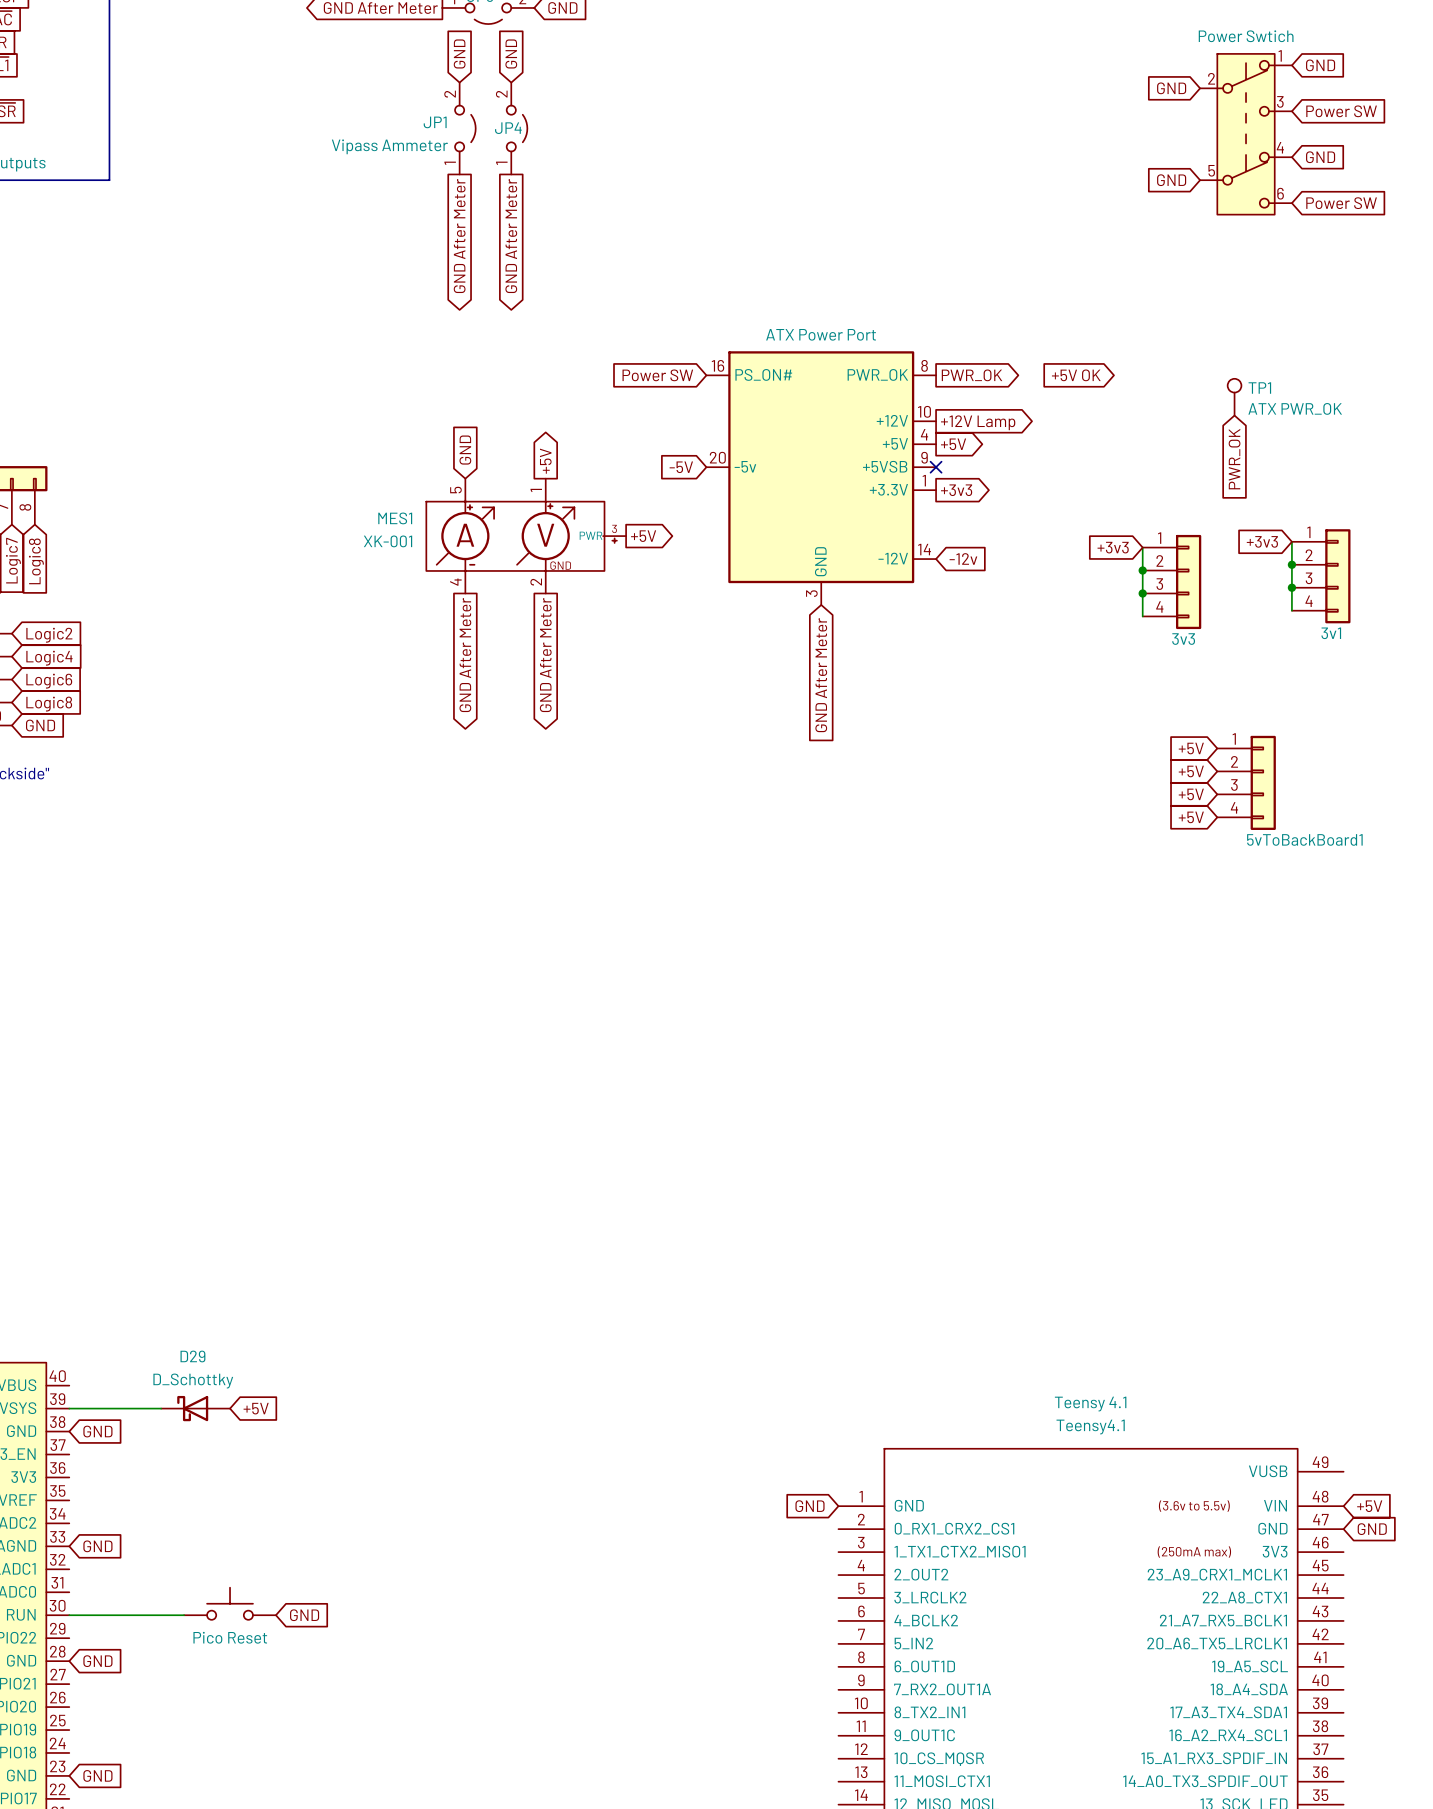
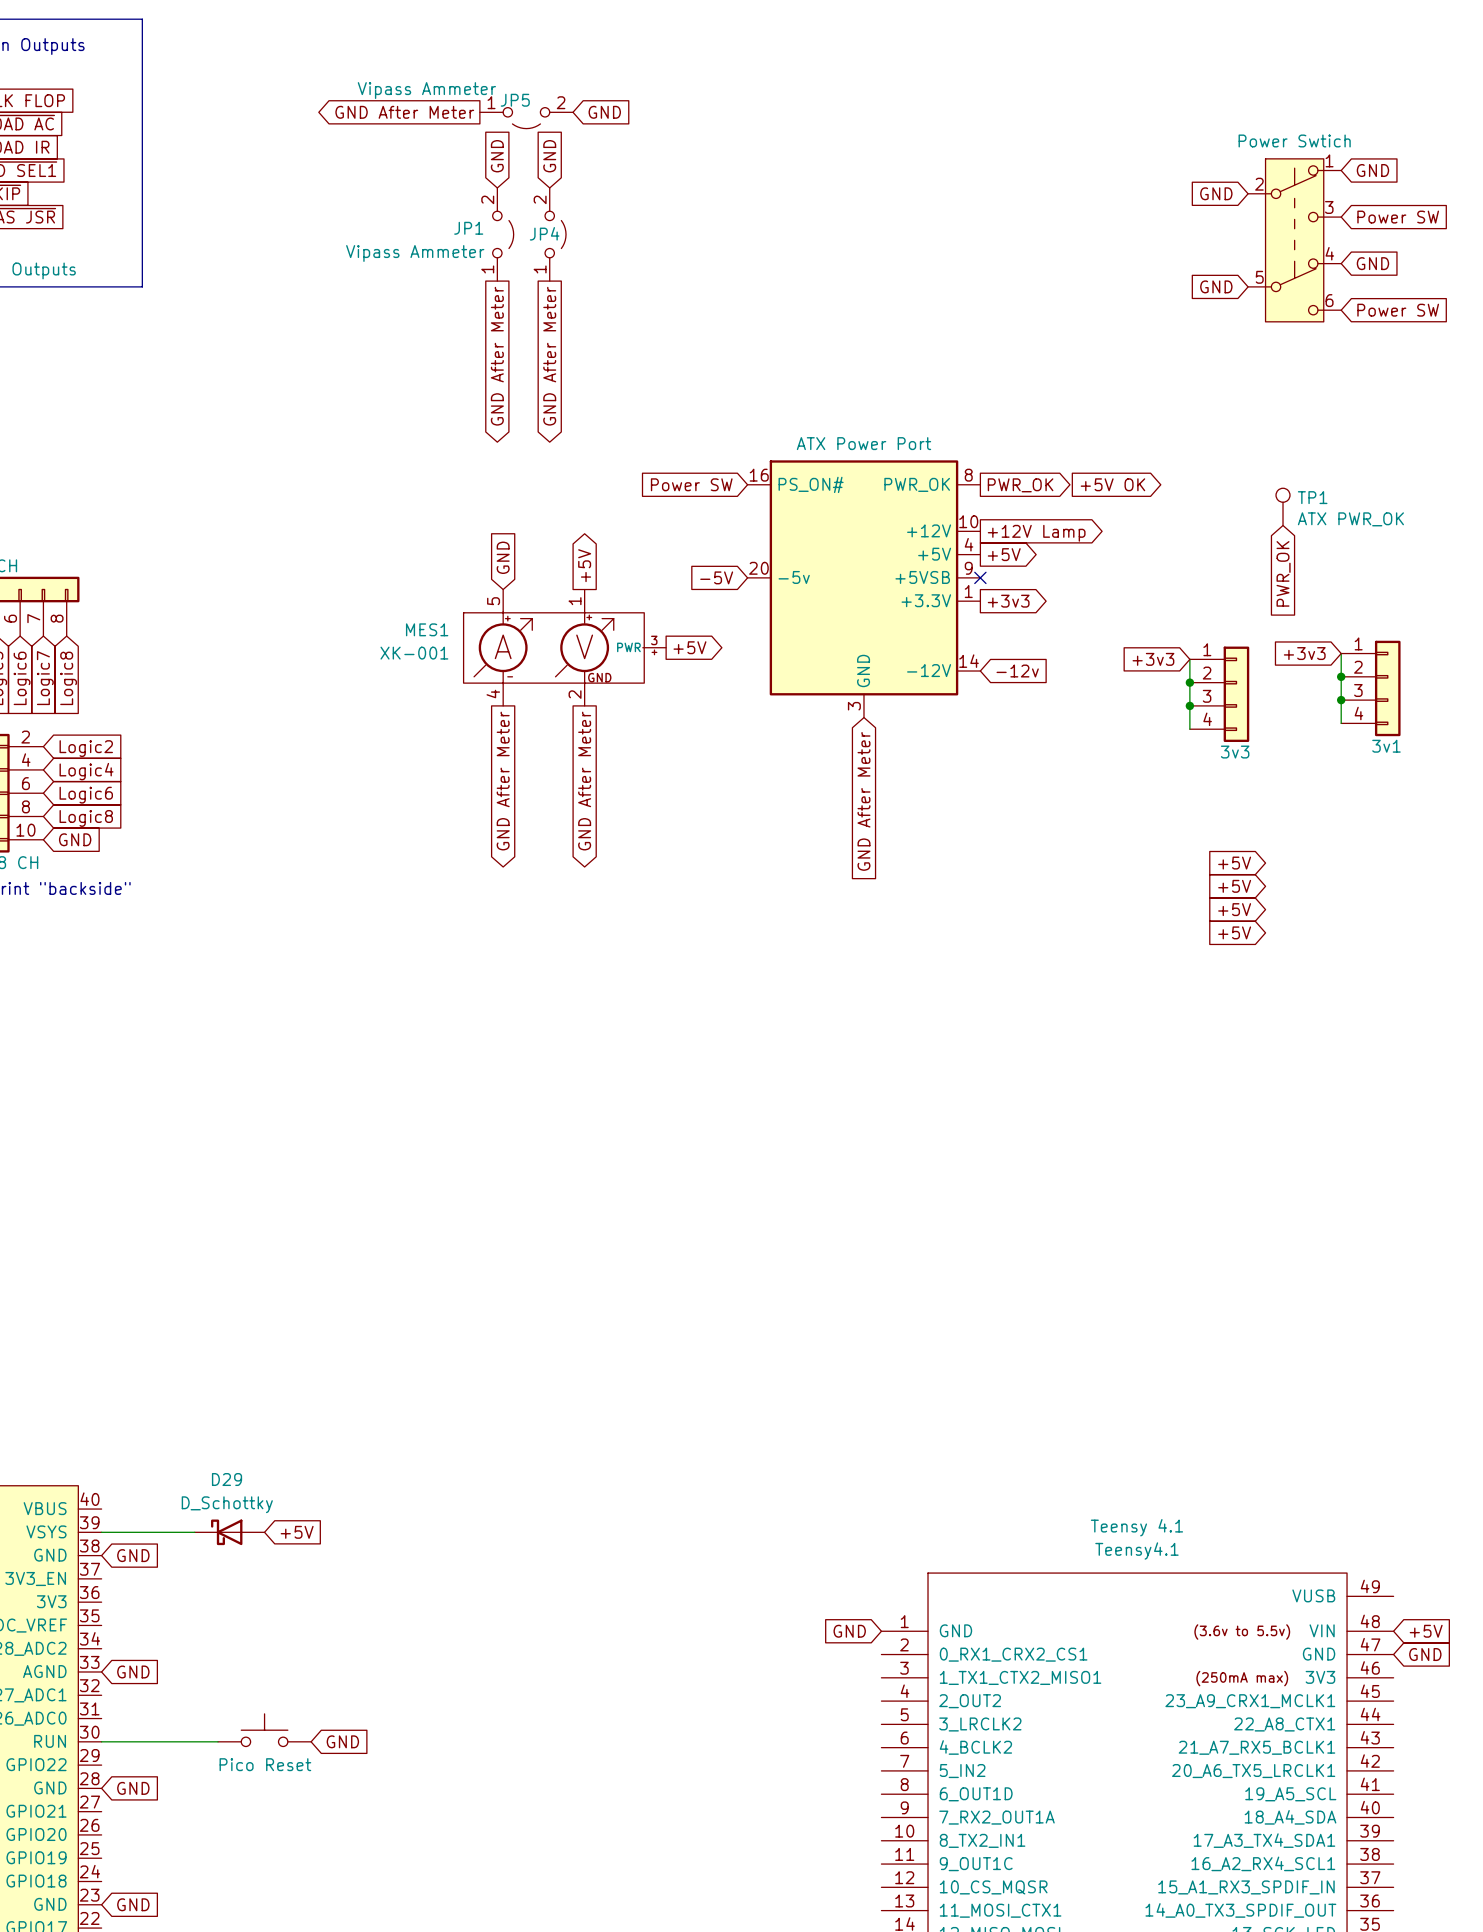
5vToBackBoard1: (1246, 782) -> none

